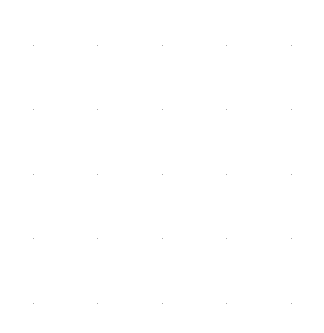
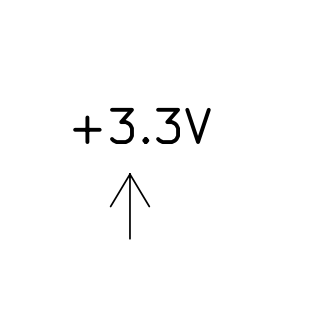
power symbol: none -> +3.3V (129, 206)

